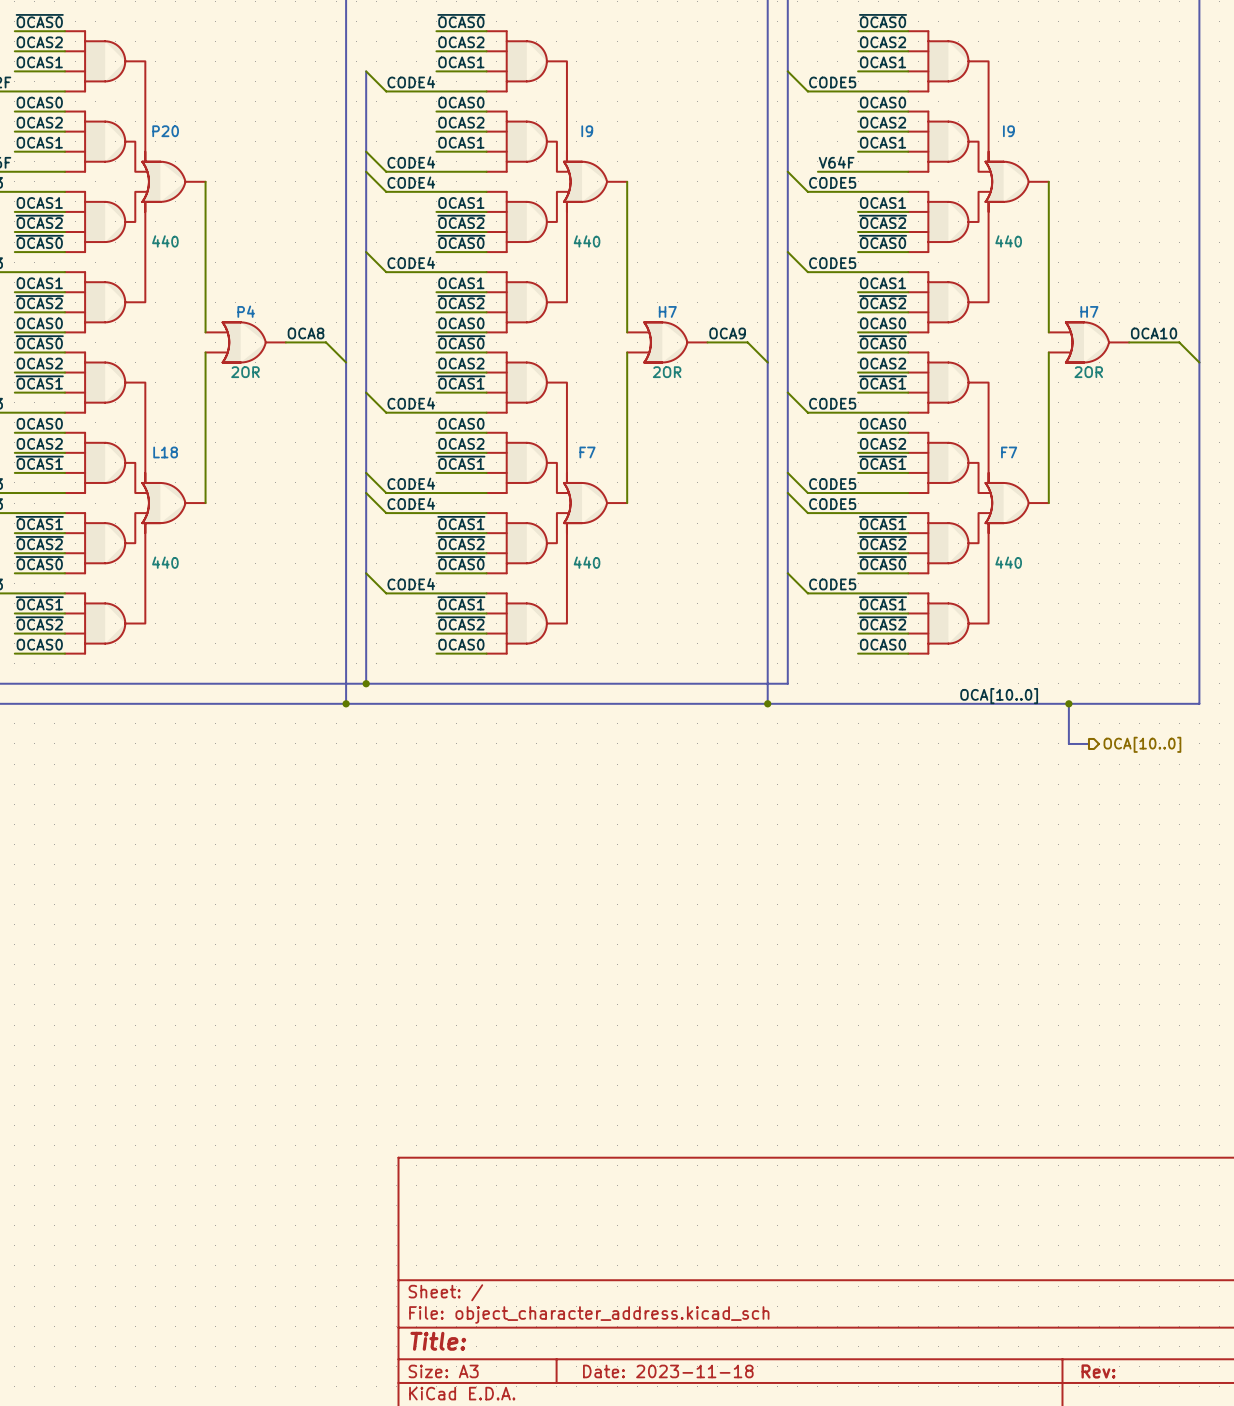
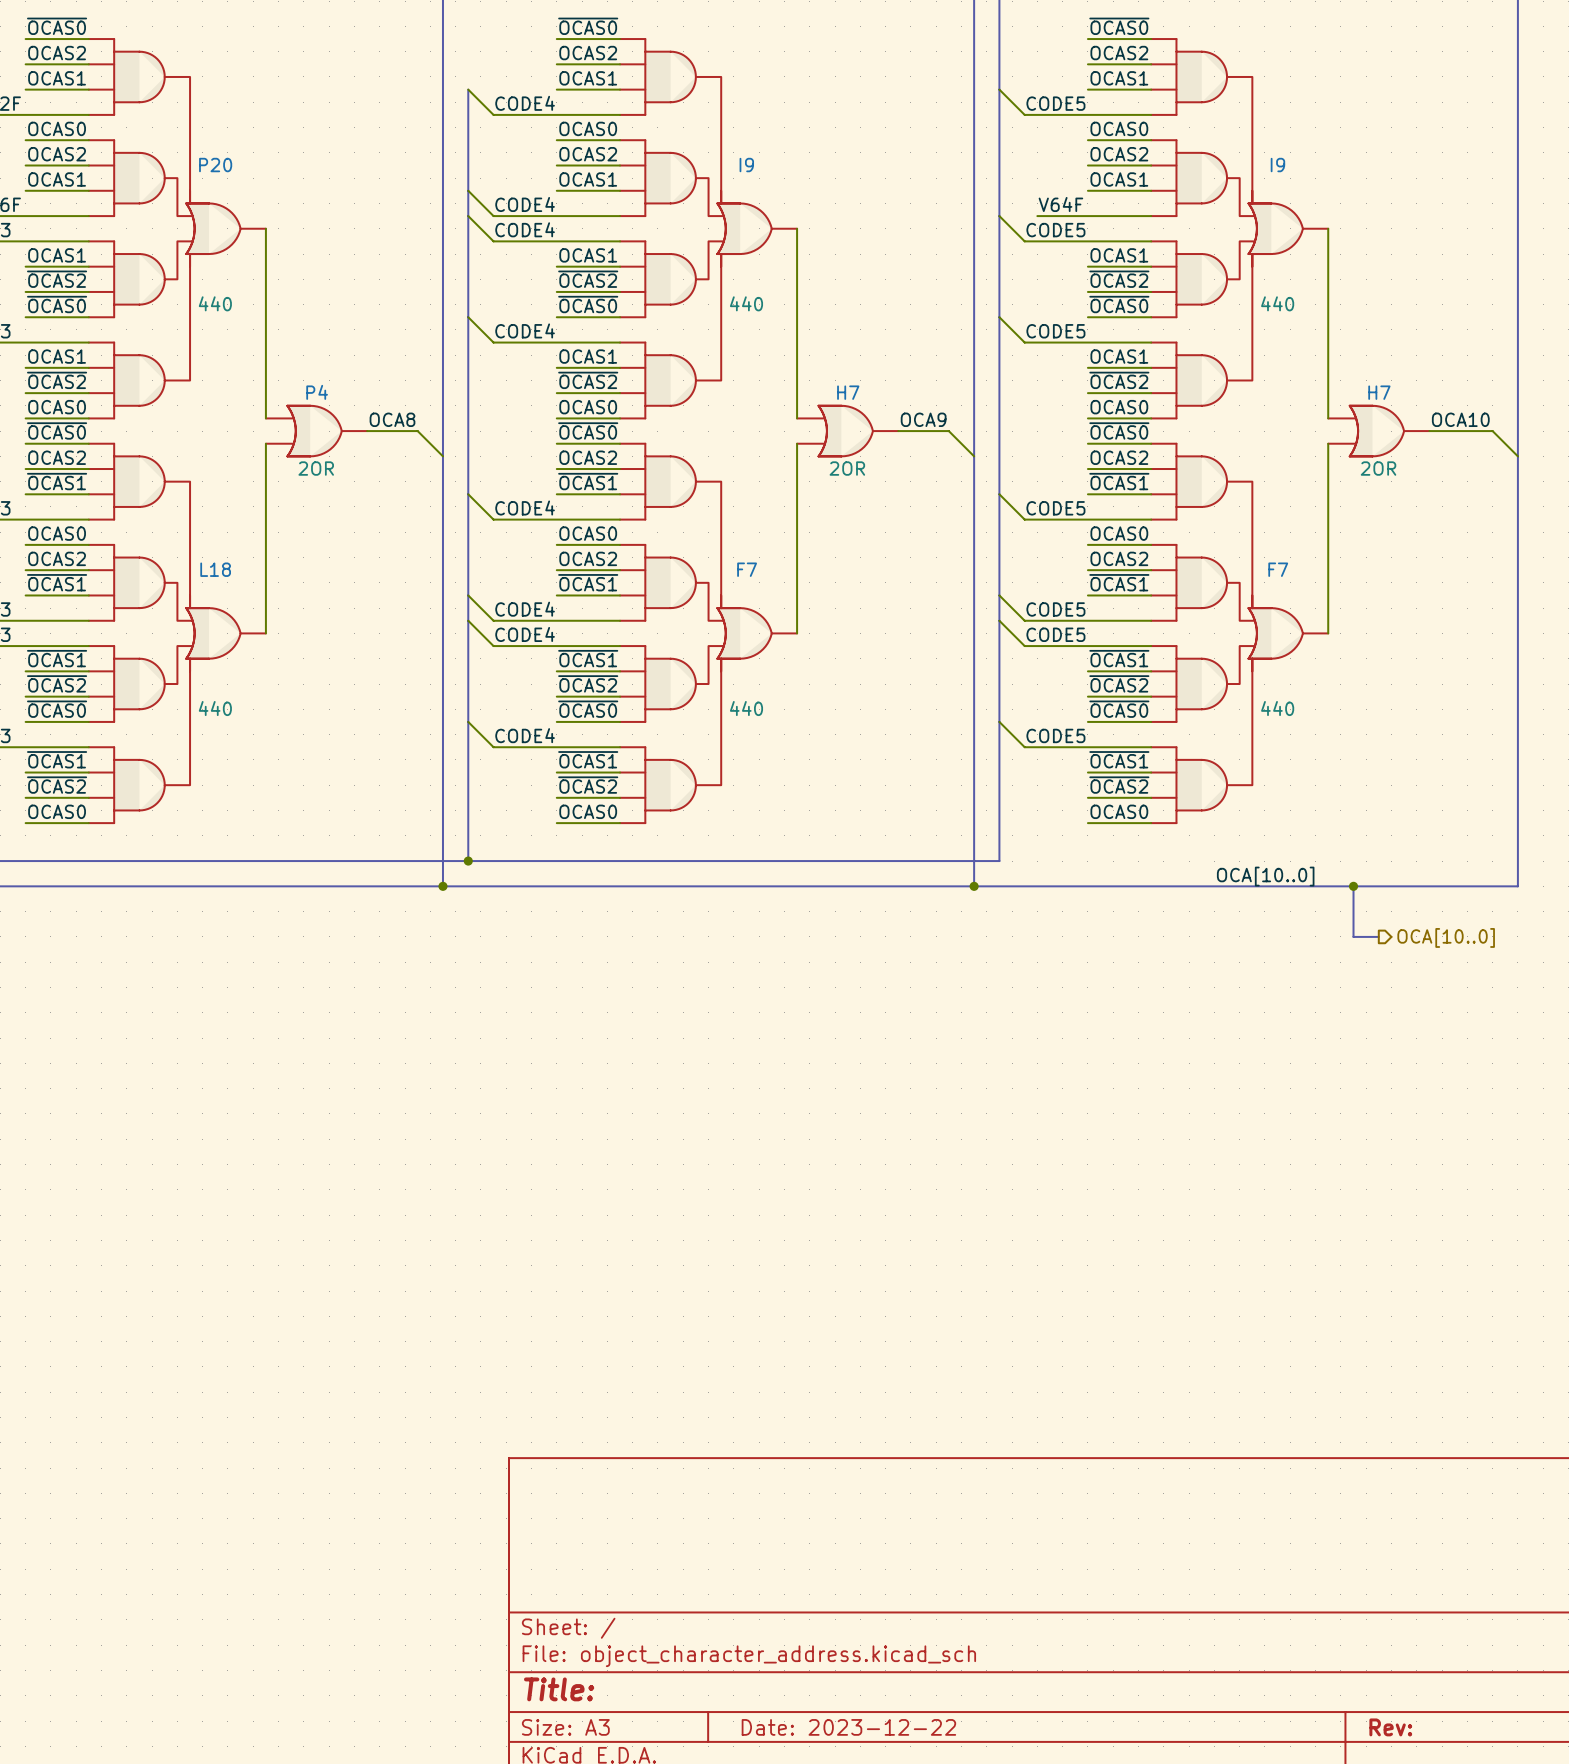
title block: Date: 2023-11-18 (668, 1371) -> Date: 2023-12-22 (848, 1727)

